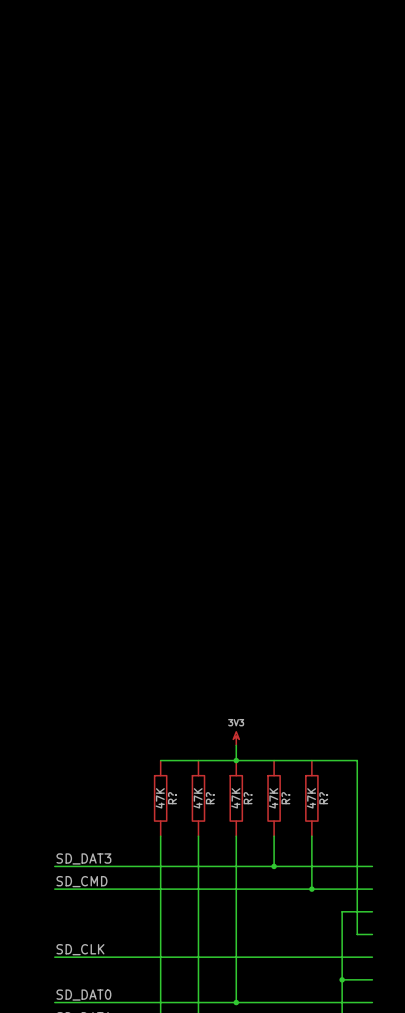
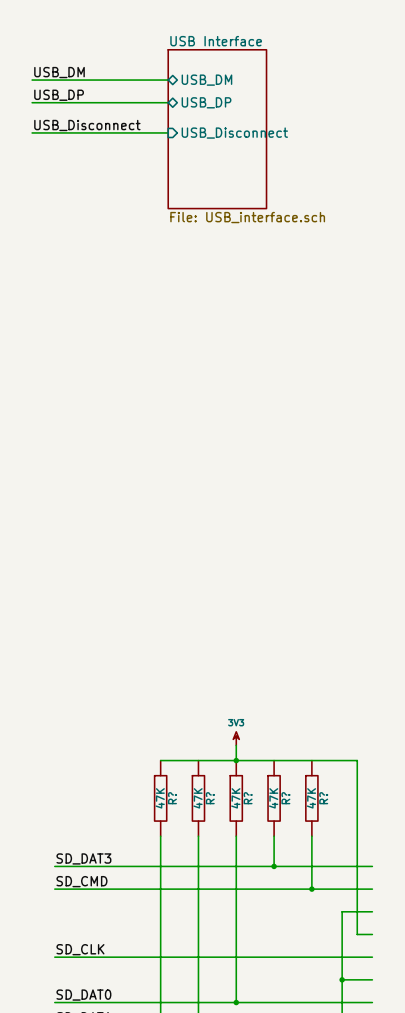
label: none -> USB_DM (59, 72)
wire: none -> (32, 80) (168, 80)
sheet pin: none -> USB_DM (206, 80)
label: none -> USB_DP (59, 95)
wire: none -> (32, 102) (168, 102)
sheet pin: none -> USB_DP (206, 102)
label: none -> USB_Disconnect (87, 125)
sheet USB Interface: none -> File: USB_interface.sch (217, 129)
wire: none -> (32, 132) (168, 132)
sheet pin: none -> USB_Disconnect (234, 133)

